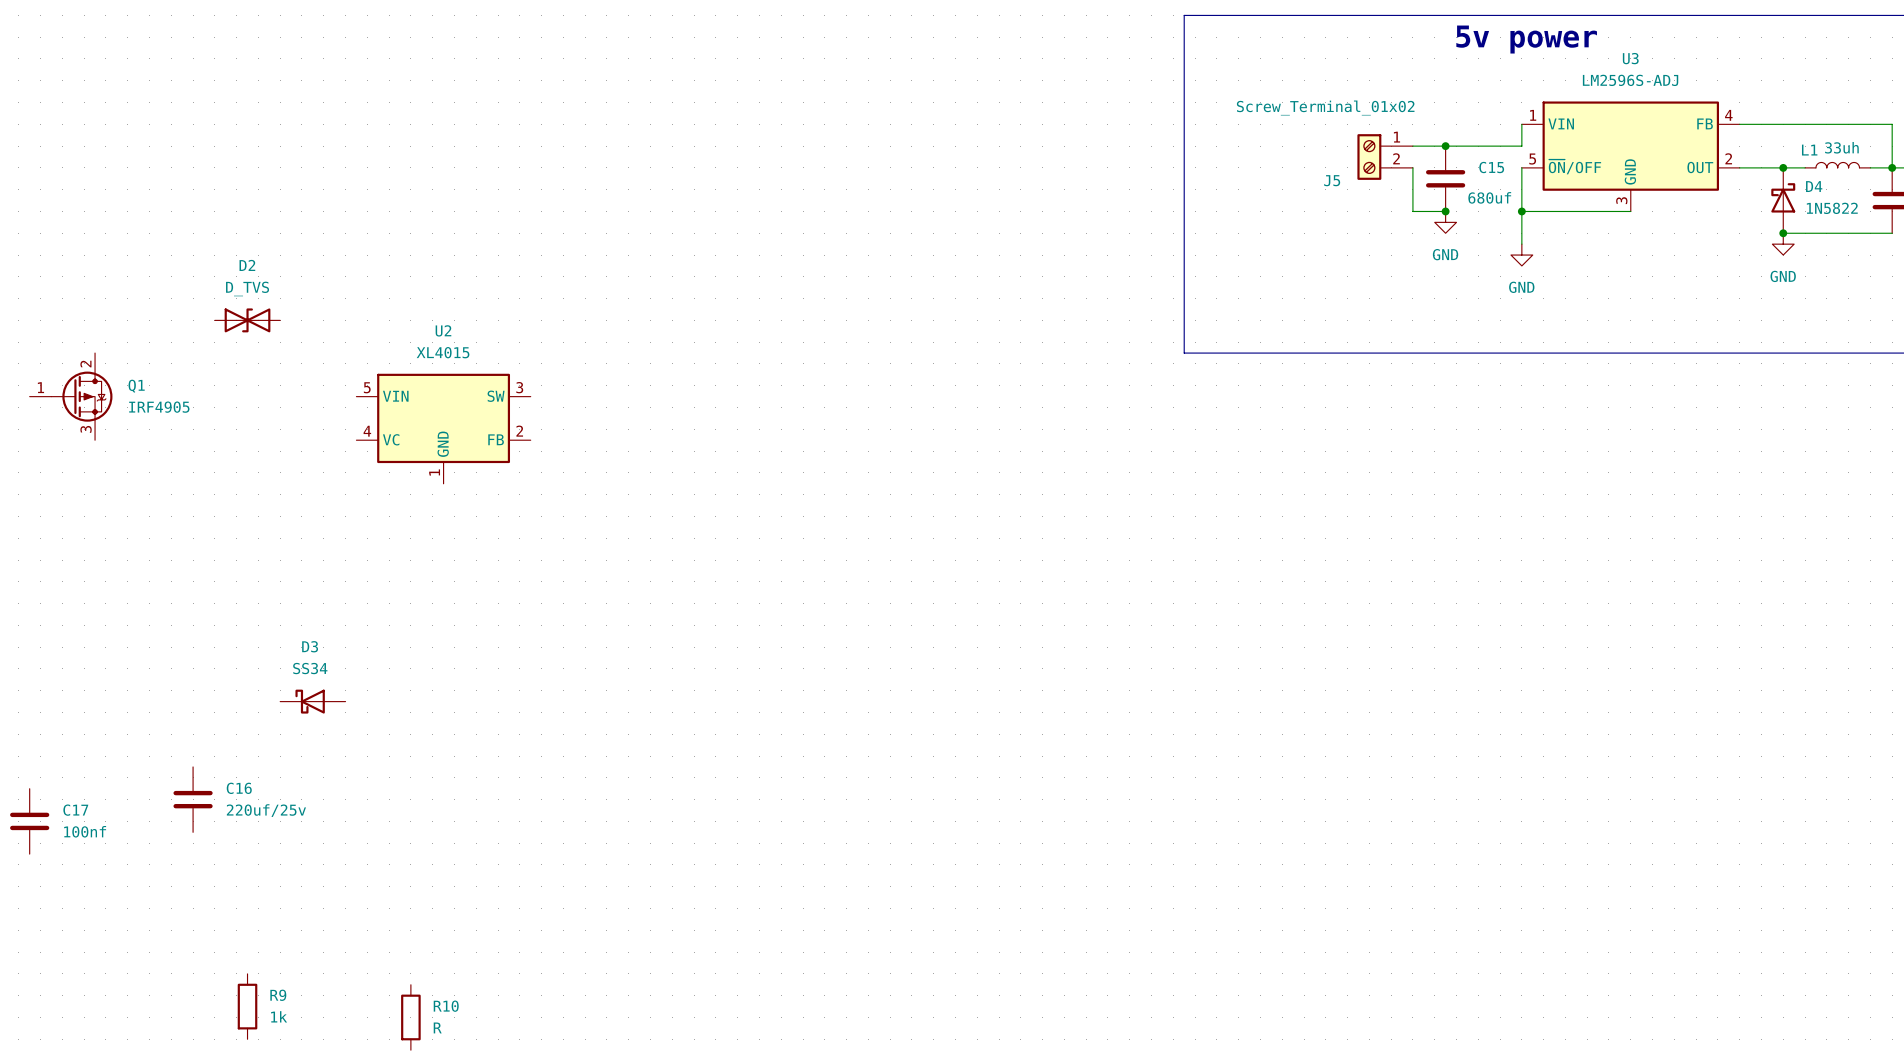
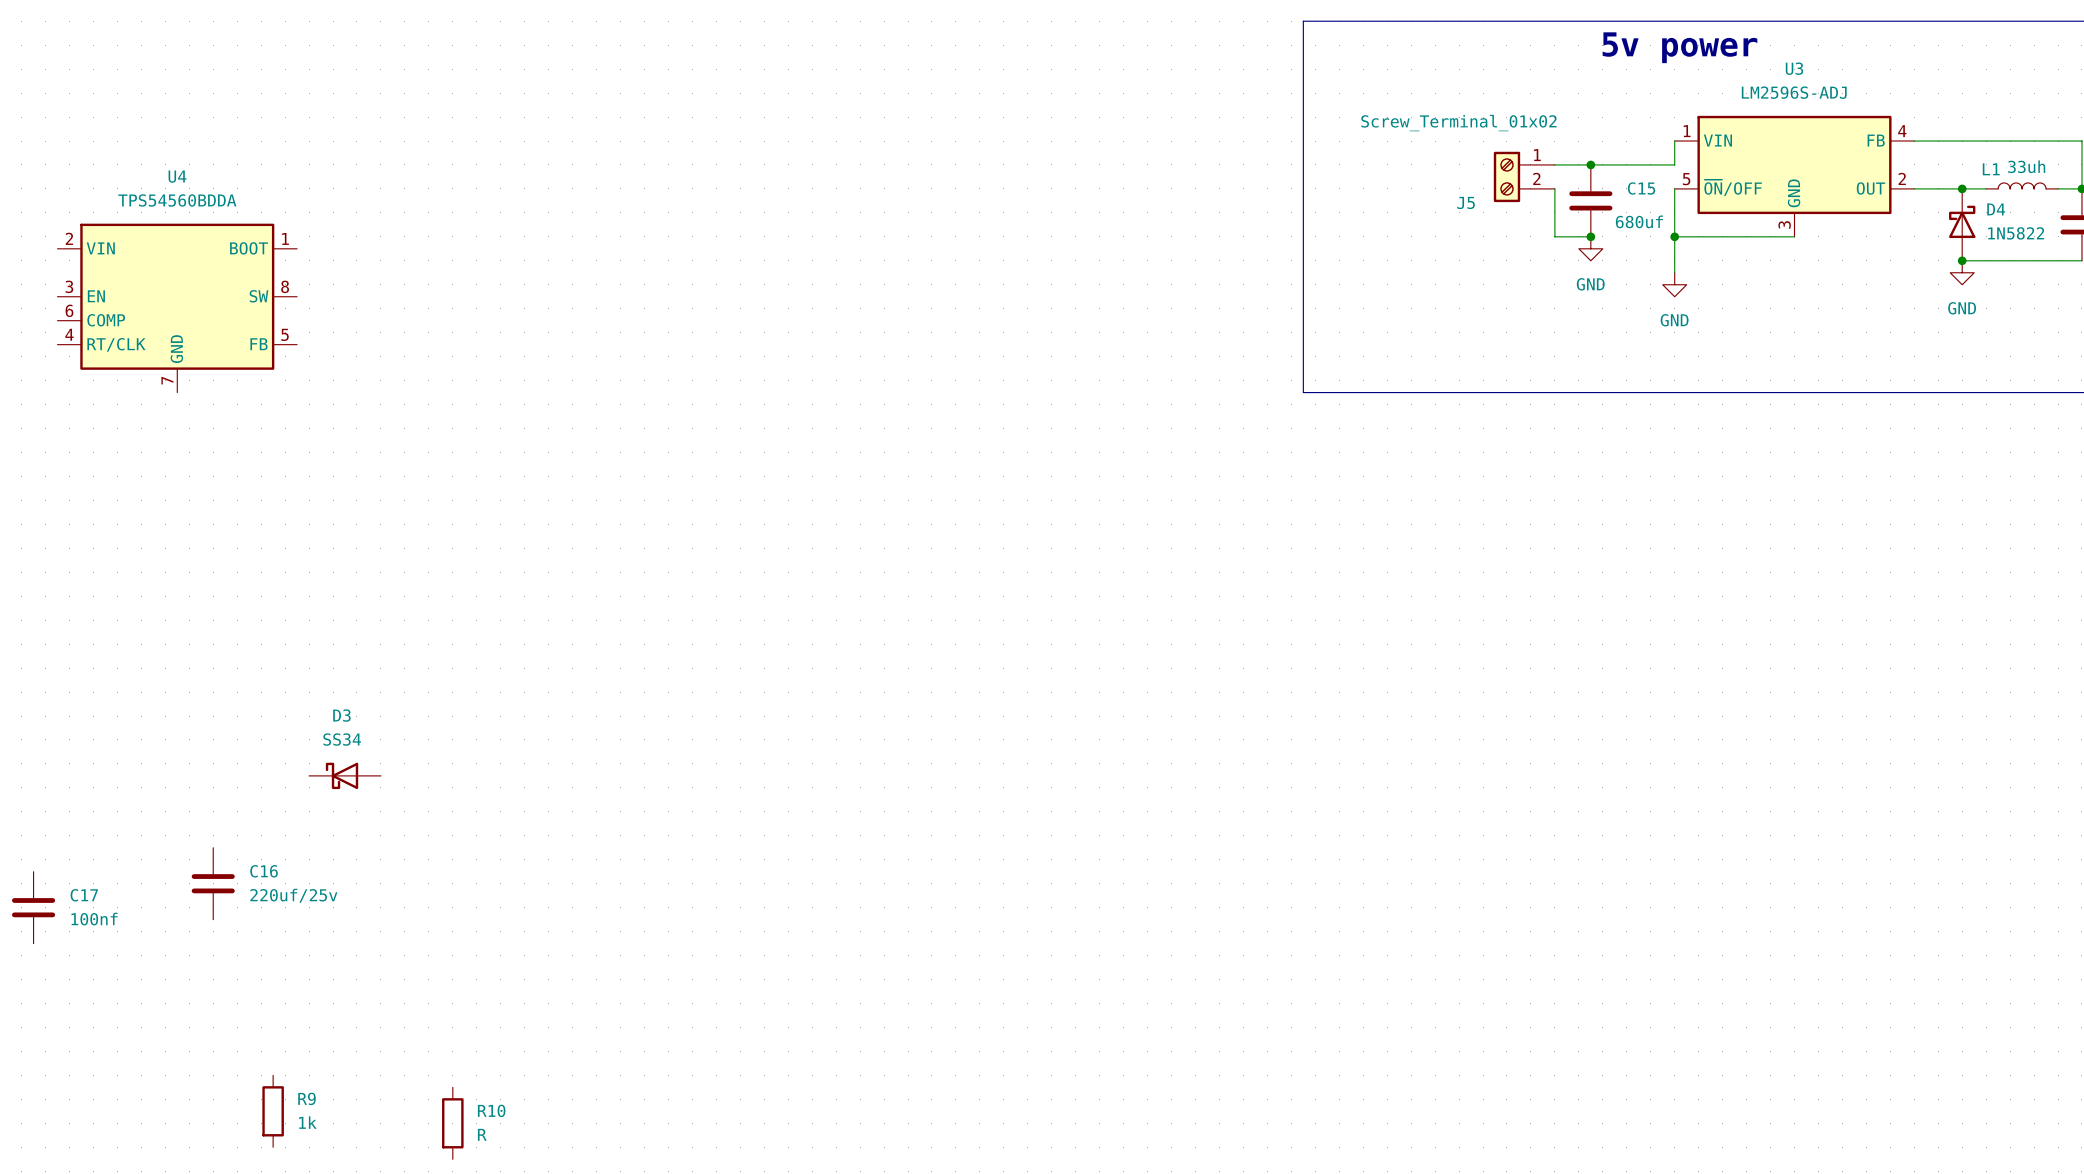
U4: none -> TPS54560BDDA (177, 308)
D2: D_TVS (247, 320) -> none
Q1: IRF4905 (71, 396) -> none
U2: XL4015 (443, 428) -> none

